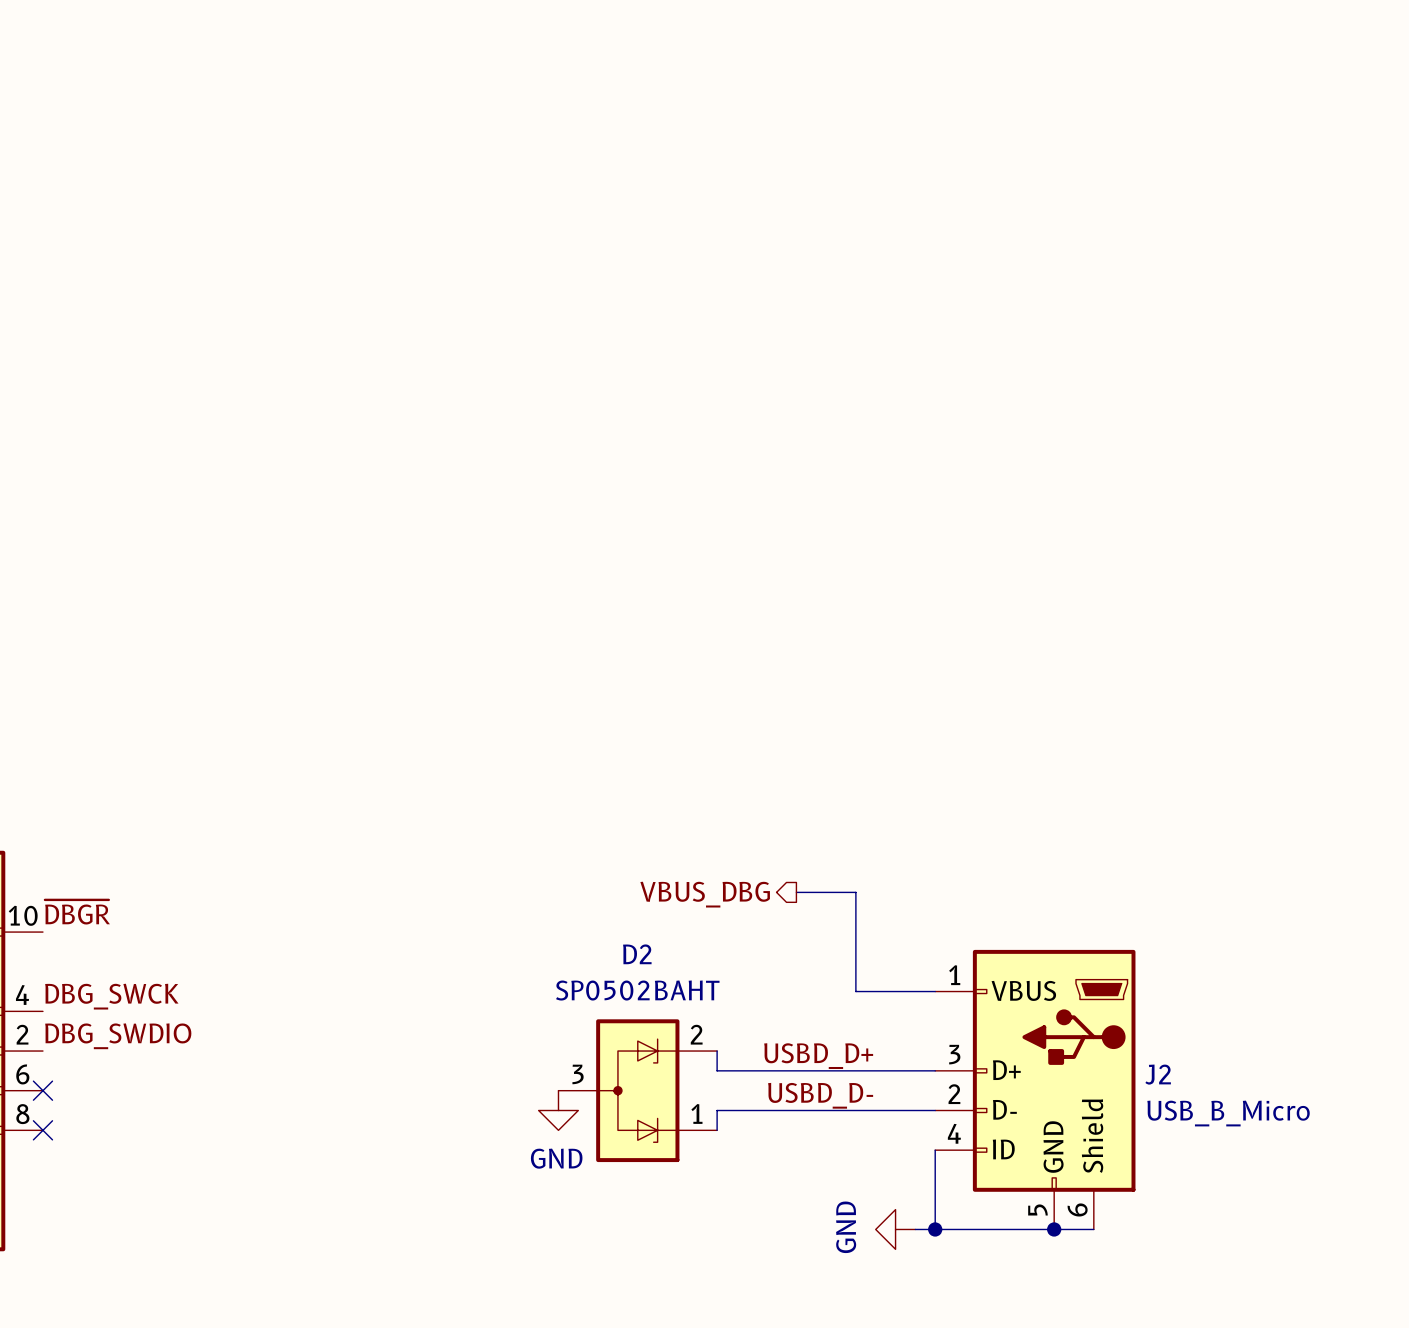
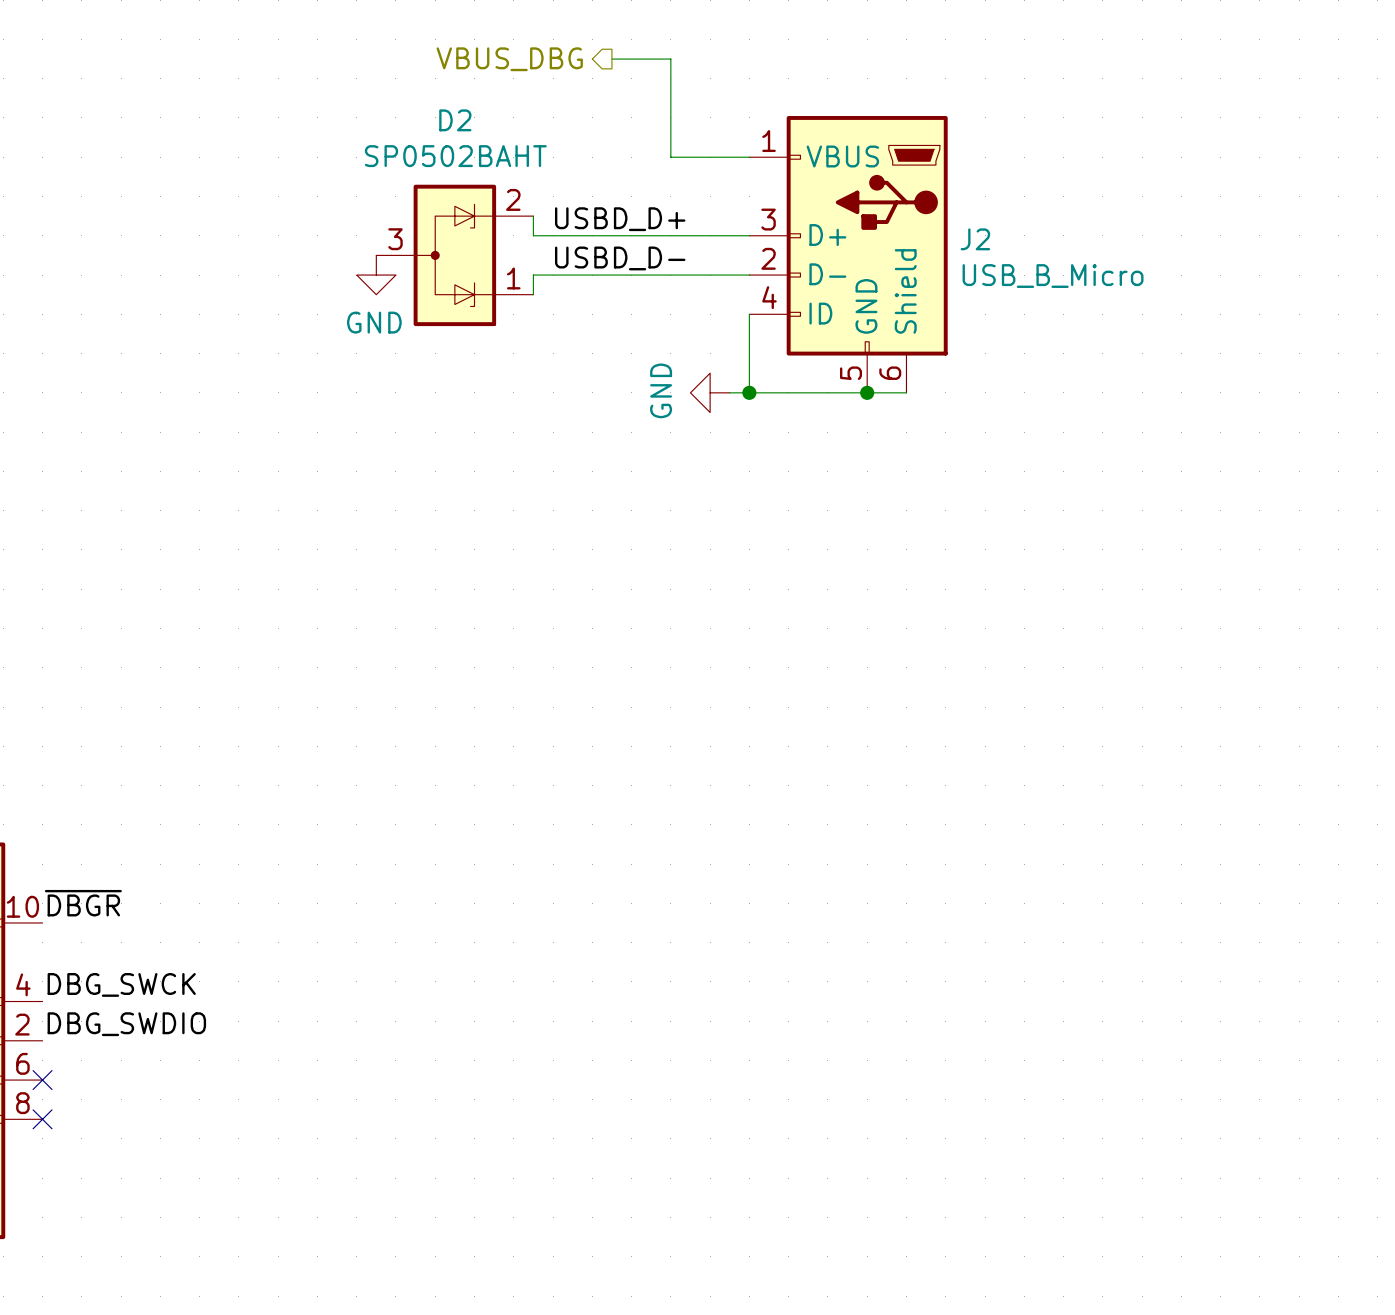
wire: none -> (611, 59) (670, 59) (670, 157) (749, 157)
hierarchical label: none -> VBUS_DBG (509, 59)
wire: none -> (533, 216) (533, 235) (749, 235)
label: none -> USBD_D+ (620, 219)
label: none -> USBD_D- (620, 258)
power symbol: none -> GND (376, 275)
wire: none -> (749, 275) (533, 275) (533, 294)
wire: none -> (749, 314) (749, 392)
power symbol: none -> GND (710, 392)
wire: none -> (729, 392) (906, 392)
junction: none -> (749, 392)
junction: none -> (867, 392)
wire: (796, 892) (855, 892) (855, 991) (935, 991) -> none
hierarchical label: VBUS_DBG (705, 894) -> none
wire: (717, 1051) (717, 1070) (935, 1070) -> none
label: USBD_D+ (818, 1056) -> none
J2 position: (1035, 1089) -> (848, 254)
D2 position: (637, 1090) -> (454, 255)
label: USBD_D- (820, 1095) -> none
power symbol: GND (558, 1110) -> none
wire: (935, 1110) (717, 1110) (717, 1130) -> none
wire: (935, 1150) (935, 1229) -> none
power symbol: GND (895, 1229) -> none
wire: (915, 1229) (1093, 1229) -> none
junction: (935, 1229) -> none
junction: (1054, 1229) -> none

